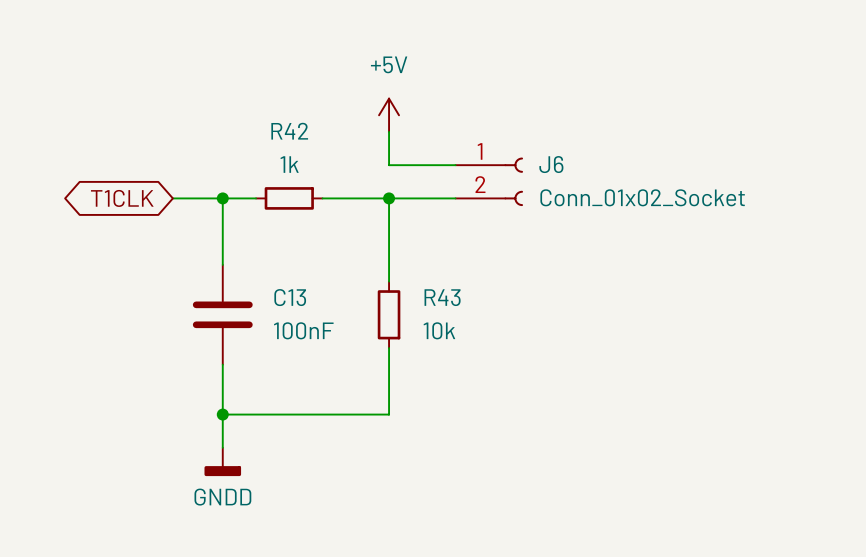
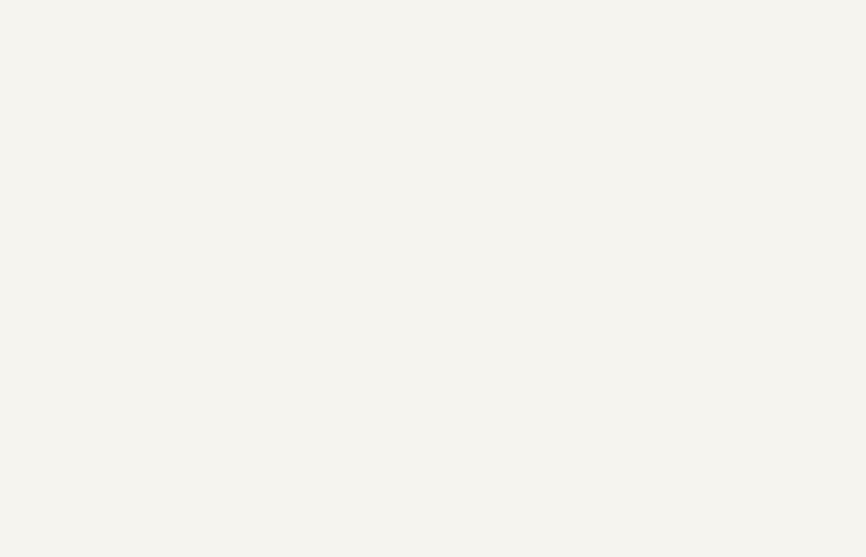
power symbol: +5V (389, 115) -> none
wire: (389, 131) (389, 165) (455, 165) -> none
J6: Conn_01x02_Socket (489, 181) -> none
global label: T1CLK (122, 198) -> none
wire: (172, 198) (256, 198) -> none
wire: (222, 198) (222, 264) -> none
junction: (222, 198) -> none
R42: 1k (289, 198) -> none
wire: (322, 198) (455, 198) -> none
wire: (389, 198) (389, 281) -> none
junction: (389, 198) -> none
C13: 100nF (222, 314) -> none
R43: 10k (389, 314) -> none
wire: (389, 348) (389, 414) (222, 414) -> none
wire: (222, 364) (222, 447) -> none
junction: (222, 414) -> none
power symbol: GNDD (222, 461) -> none

